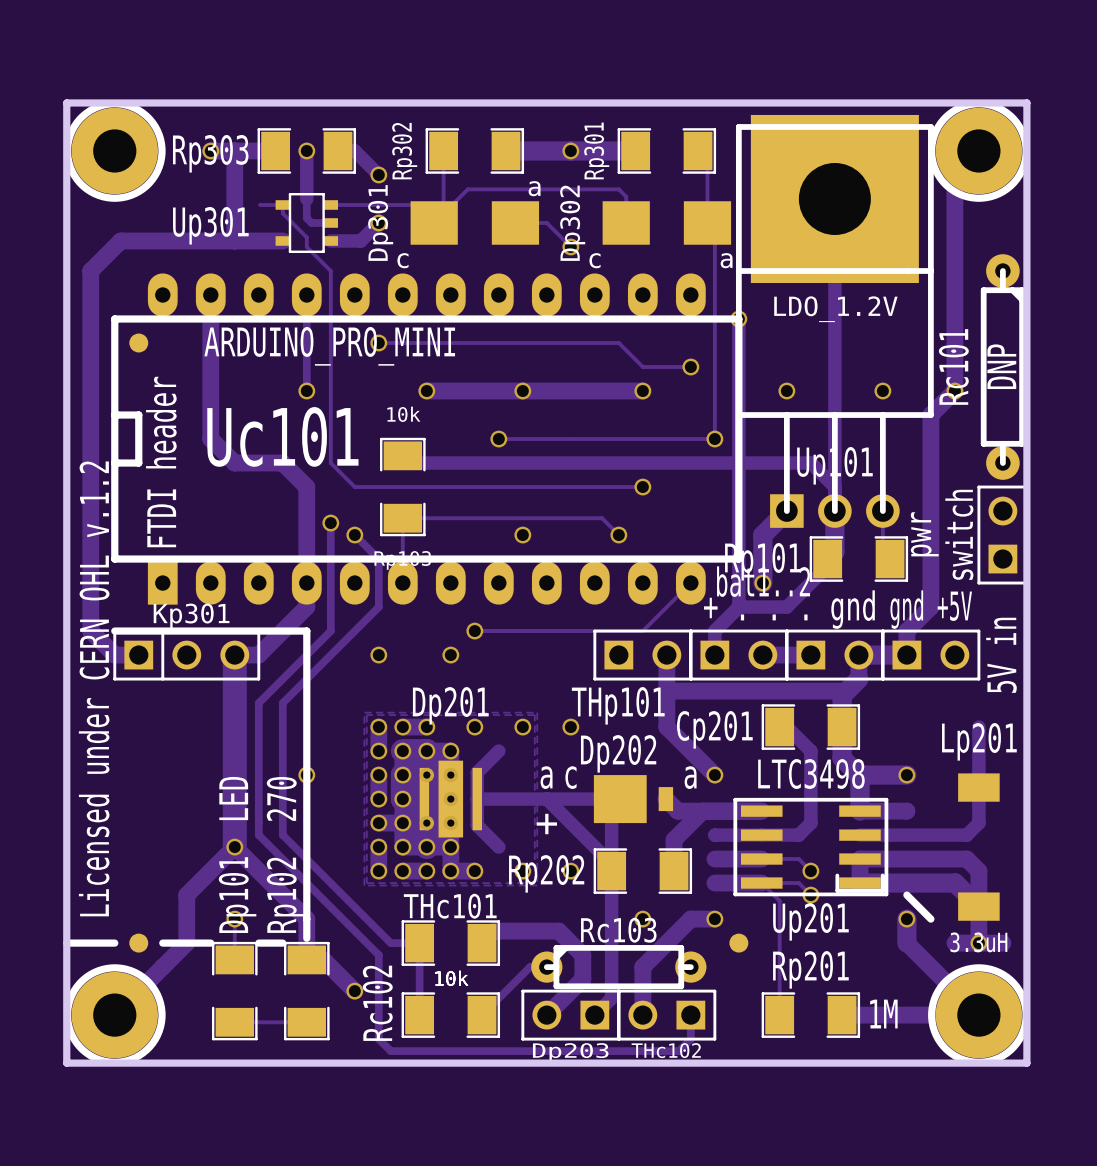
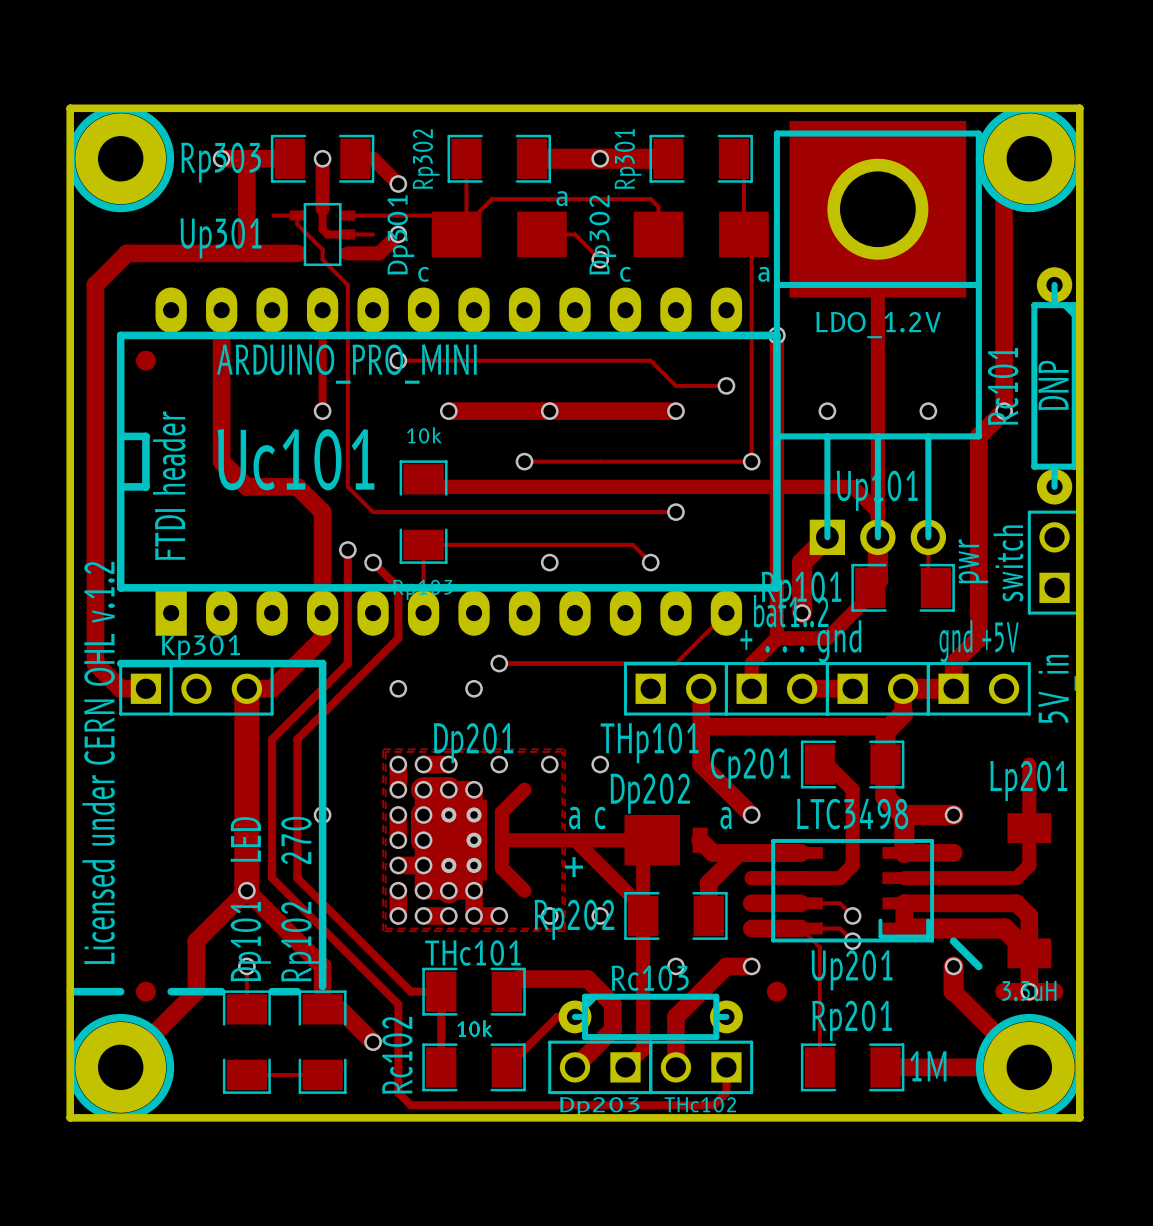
track: none -> (347, 234) (373, 234)

